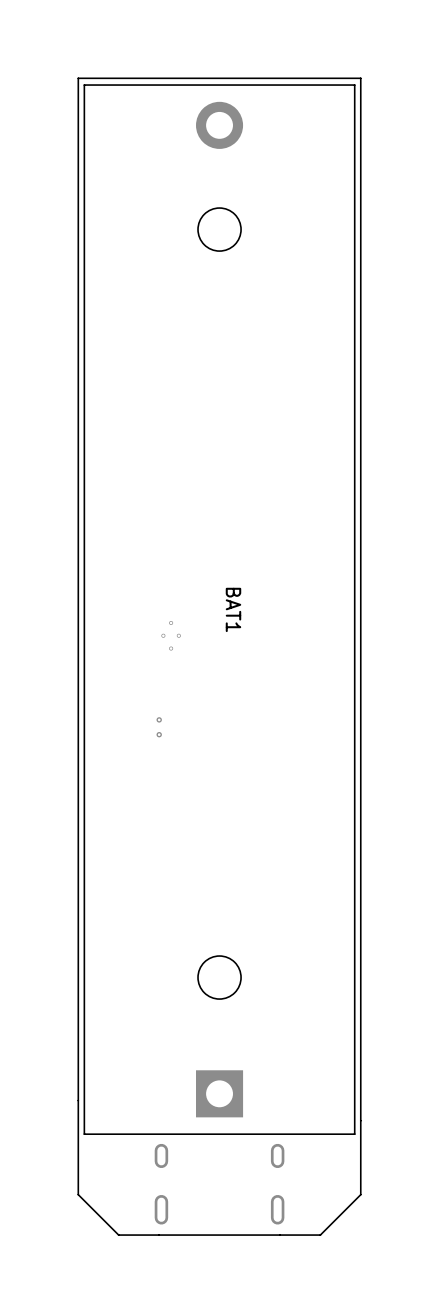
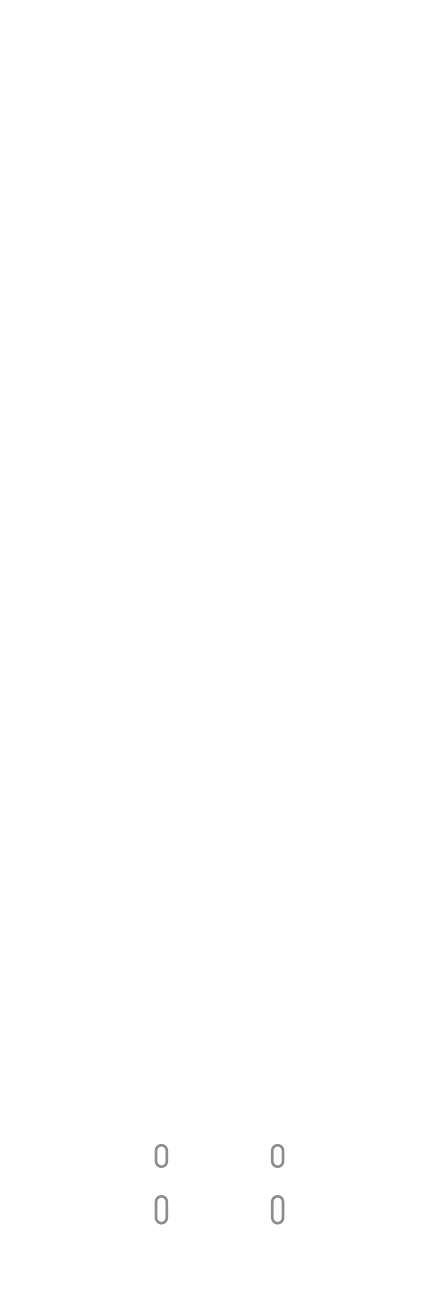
board edge: (360, 78) (360, 1194) (320, 1235) (118, 1235) (78, 1194) (78, 78) (360, 78) -> none
BAT1: (219, 609) -> none
part: (171, 635) -> none
part: (159, 727) -> none

